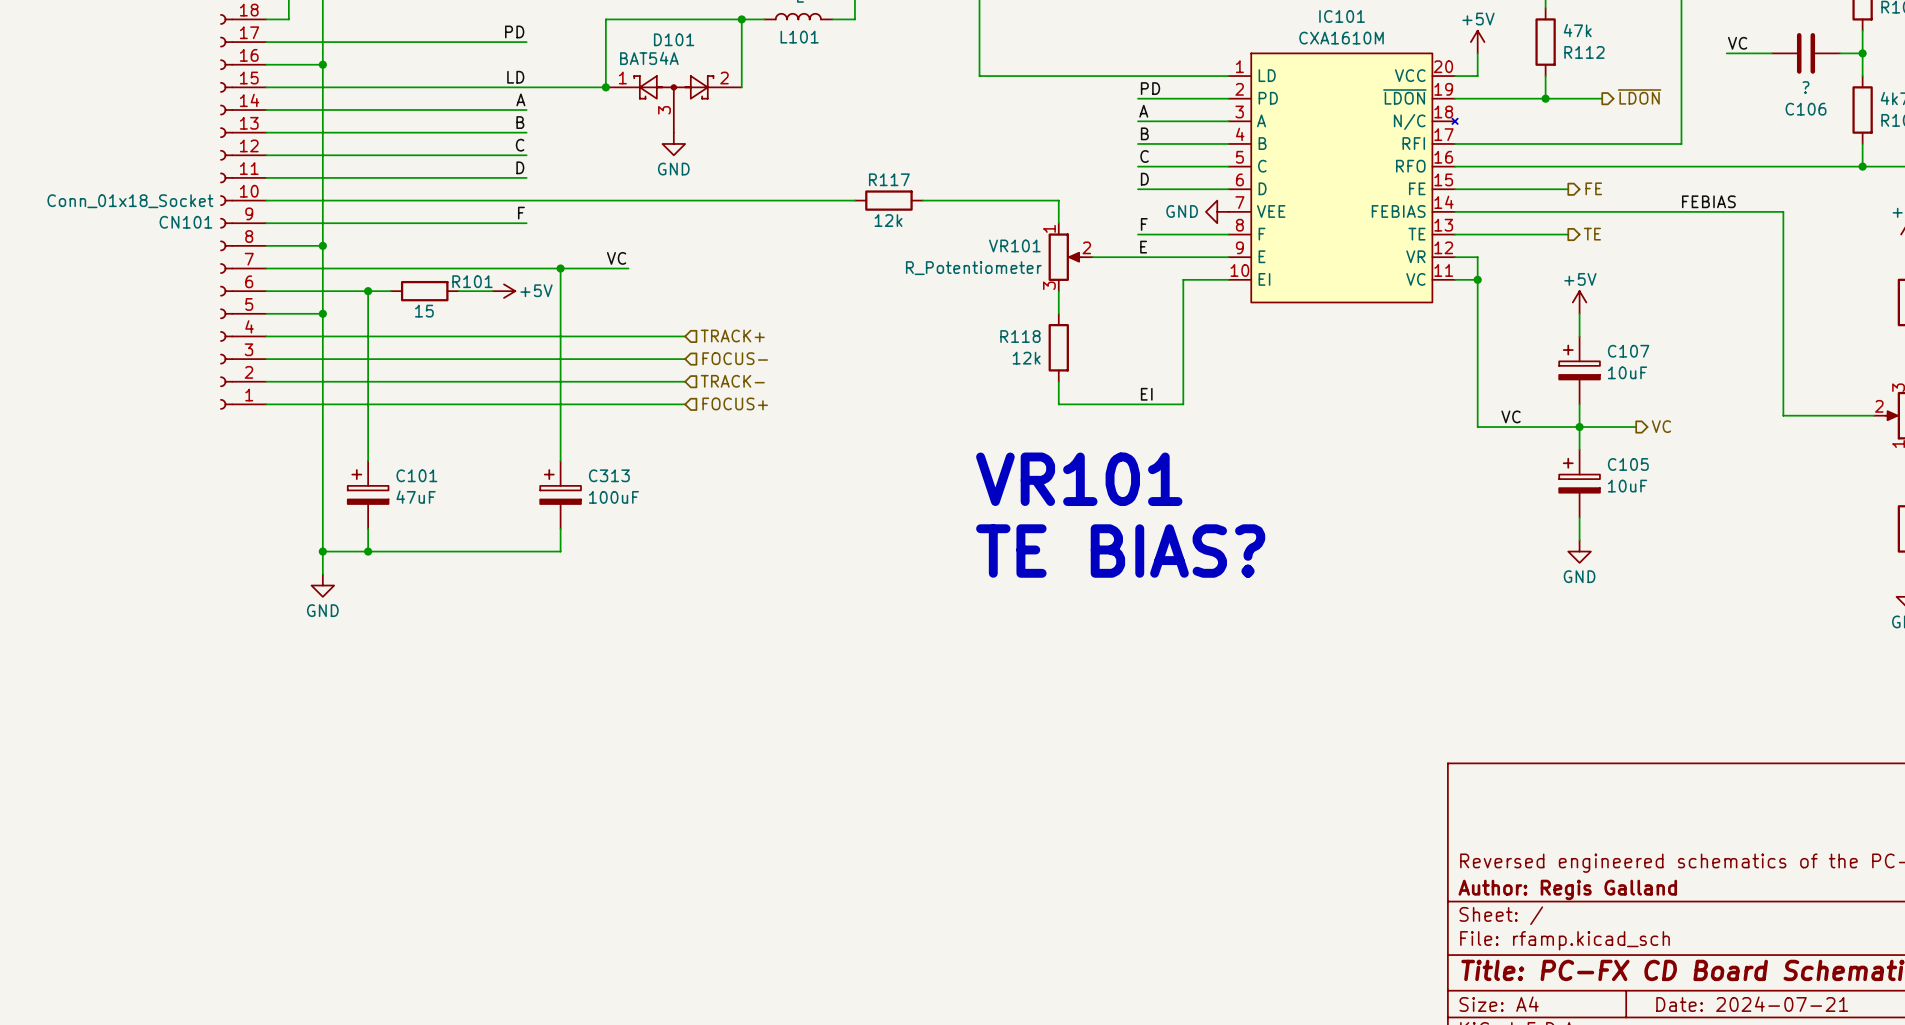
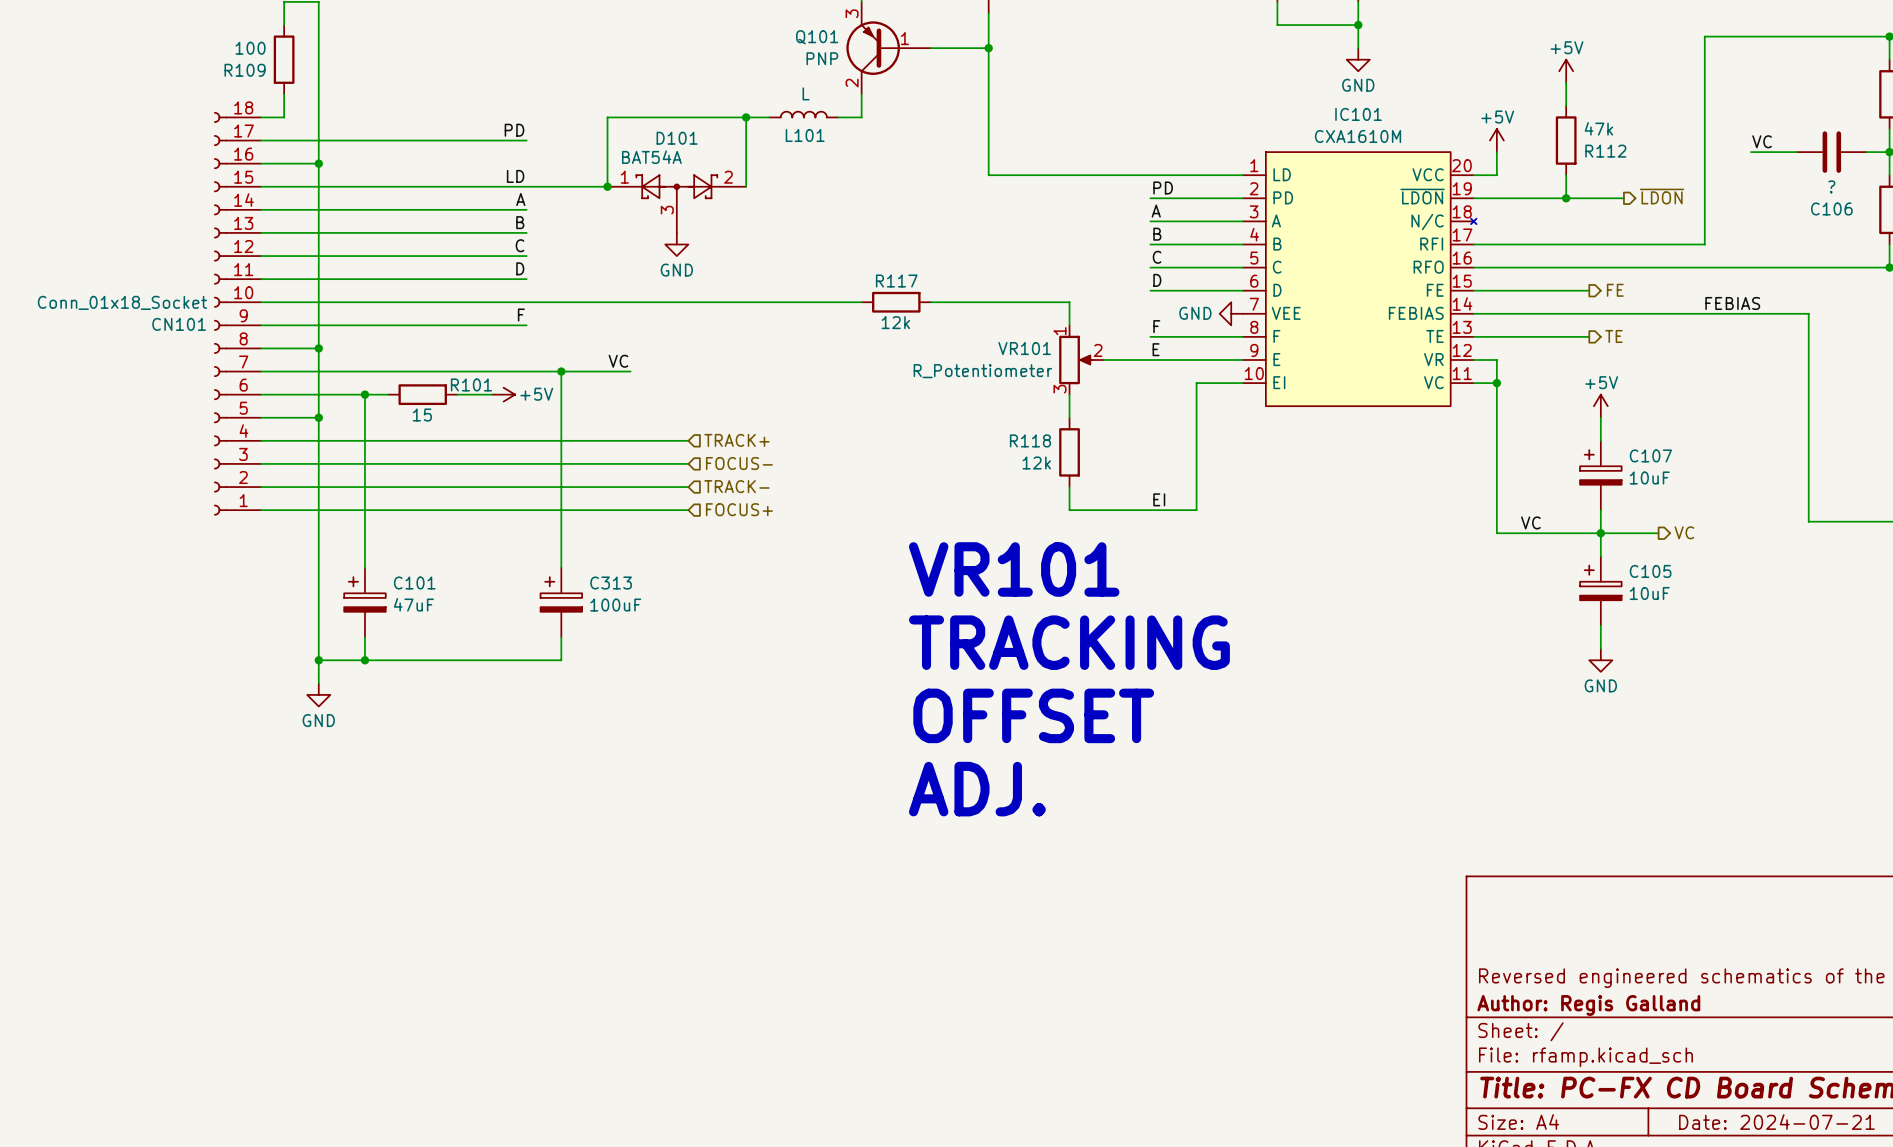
text position: VR101 (1079, 479) -> VR101 (1014, 569)
text: none -> TRACKING (1069, 642)
text: TE BIAS? (1120, 551) -> none
text: none -> OFFSET (1033, 715)
text: none -> ADJ. (977, 789)

